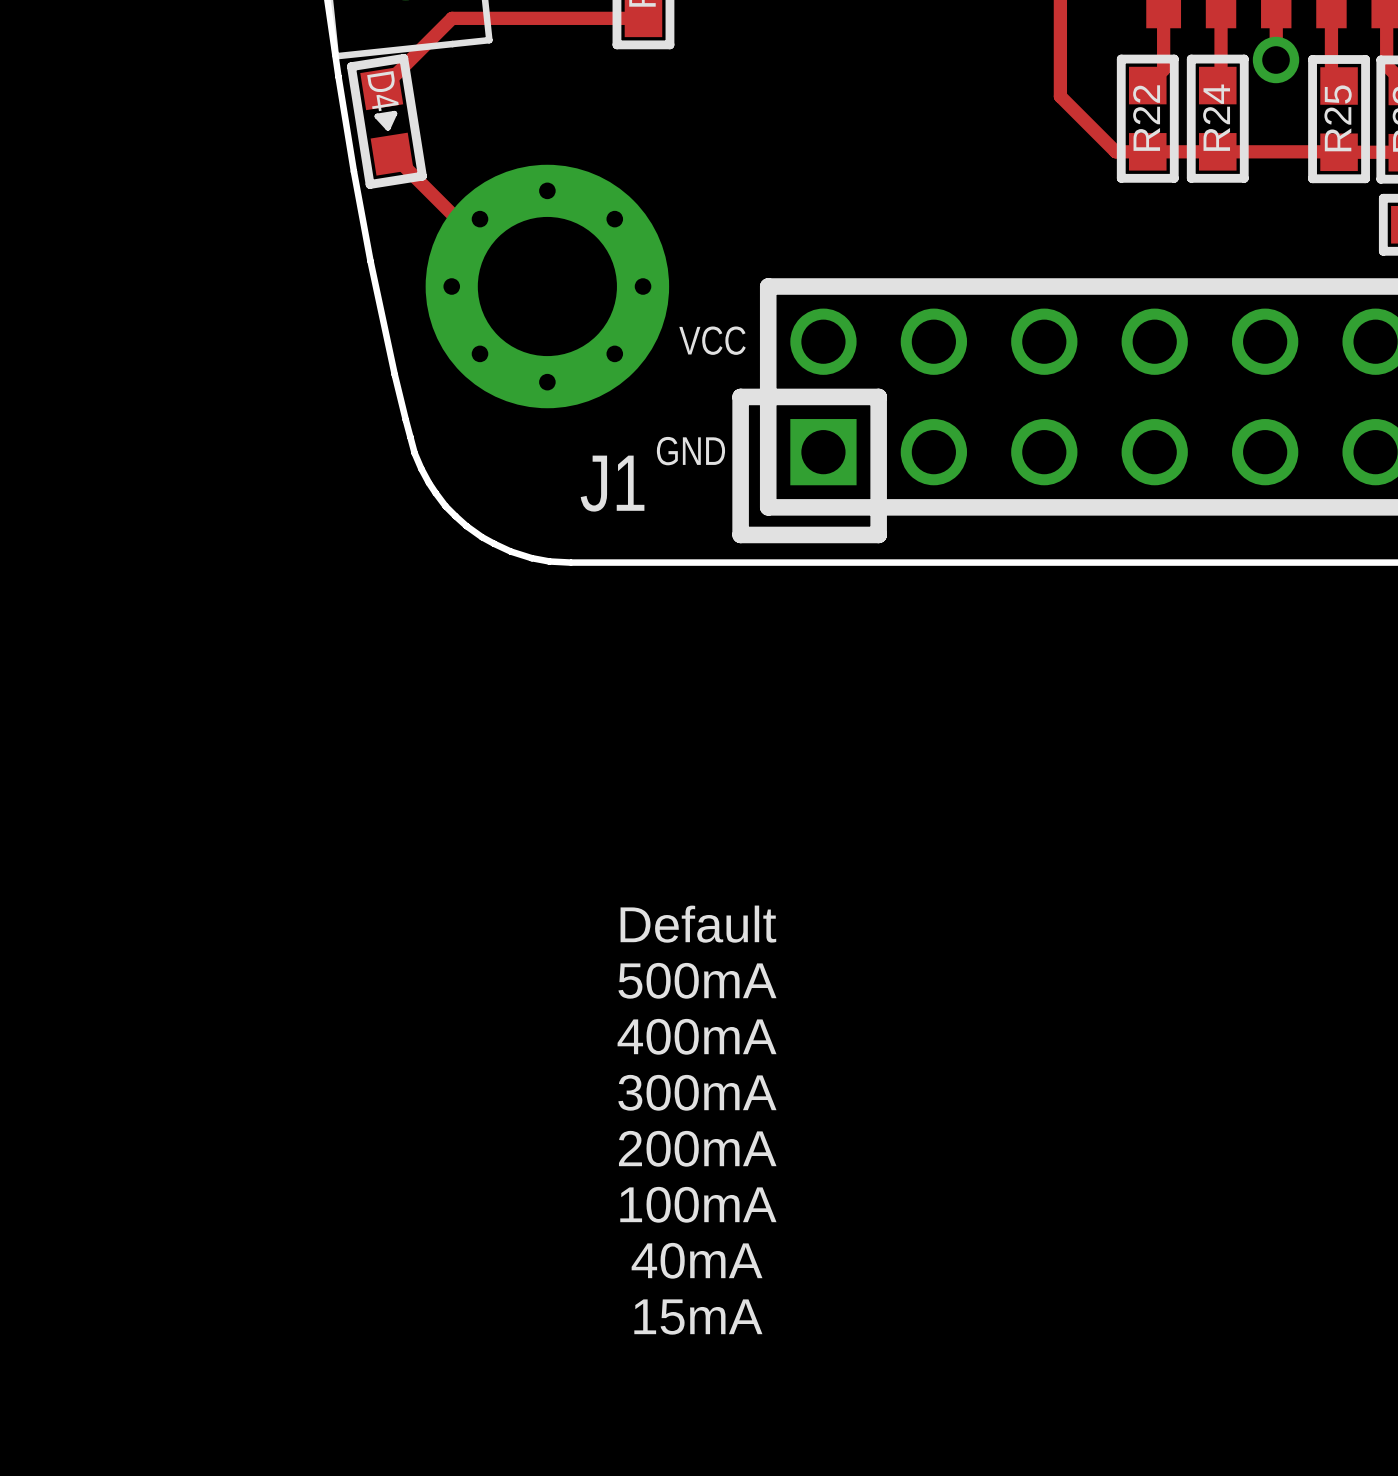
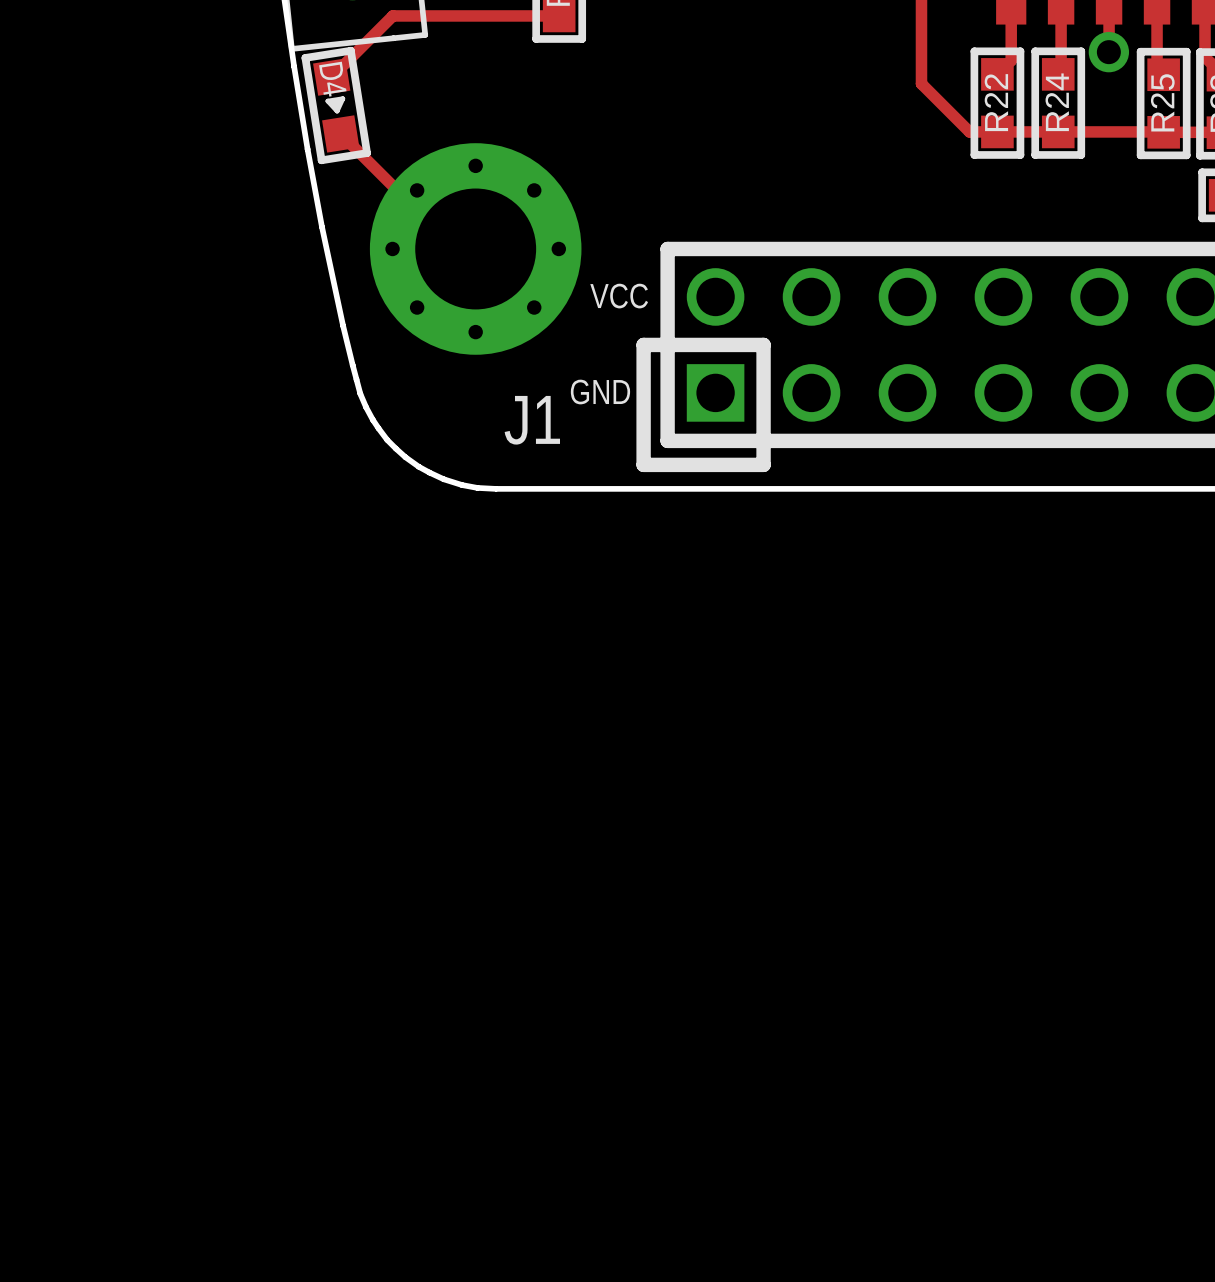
text: Default (698, 924) -> none
text: 500mA (697, 980) -> none
text: 400mA (697, 1036) -> none
text: 300mA (697, 1092) -> none
text: 200mA (697, 1148) -> none
text: 100mA (698, 1204) -> none
text: 40mA (697, 1260) -> none
text: 15mA (698, 1317) -> none

